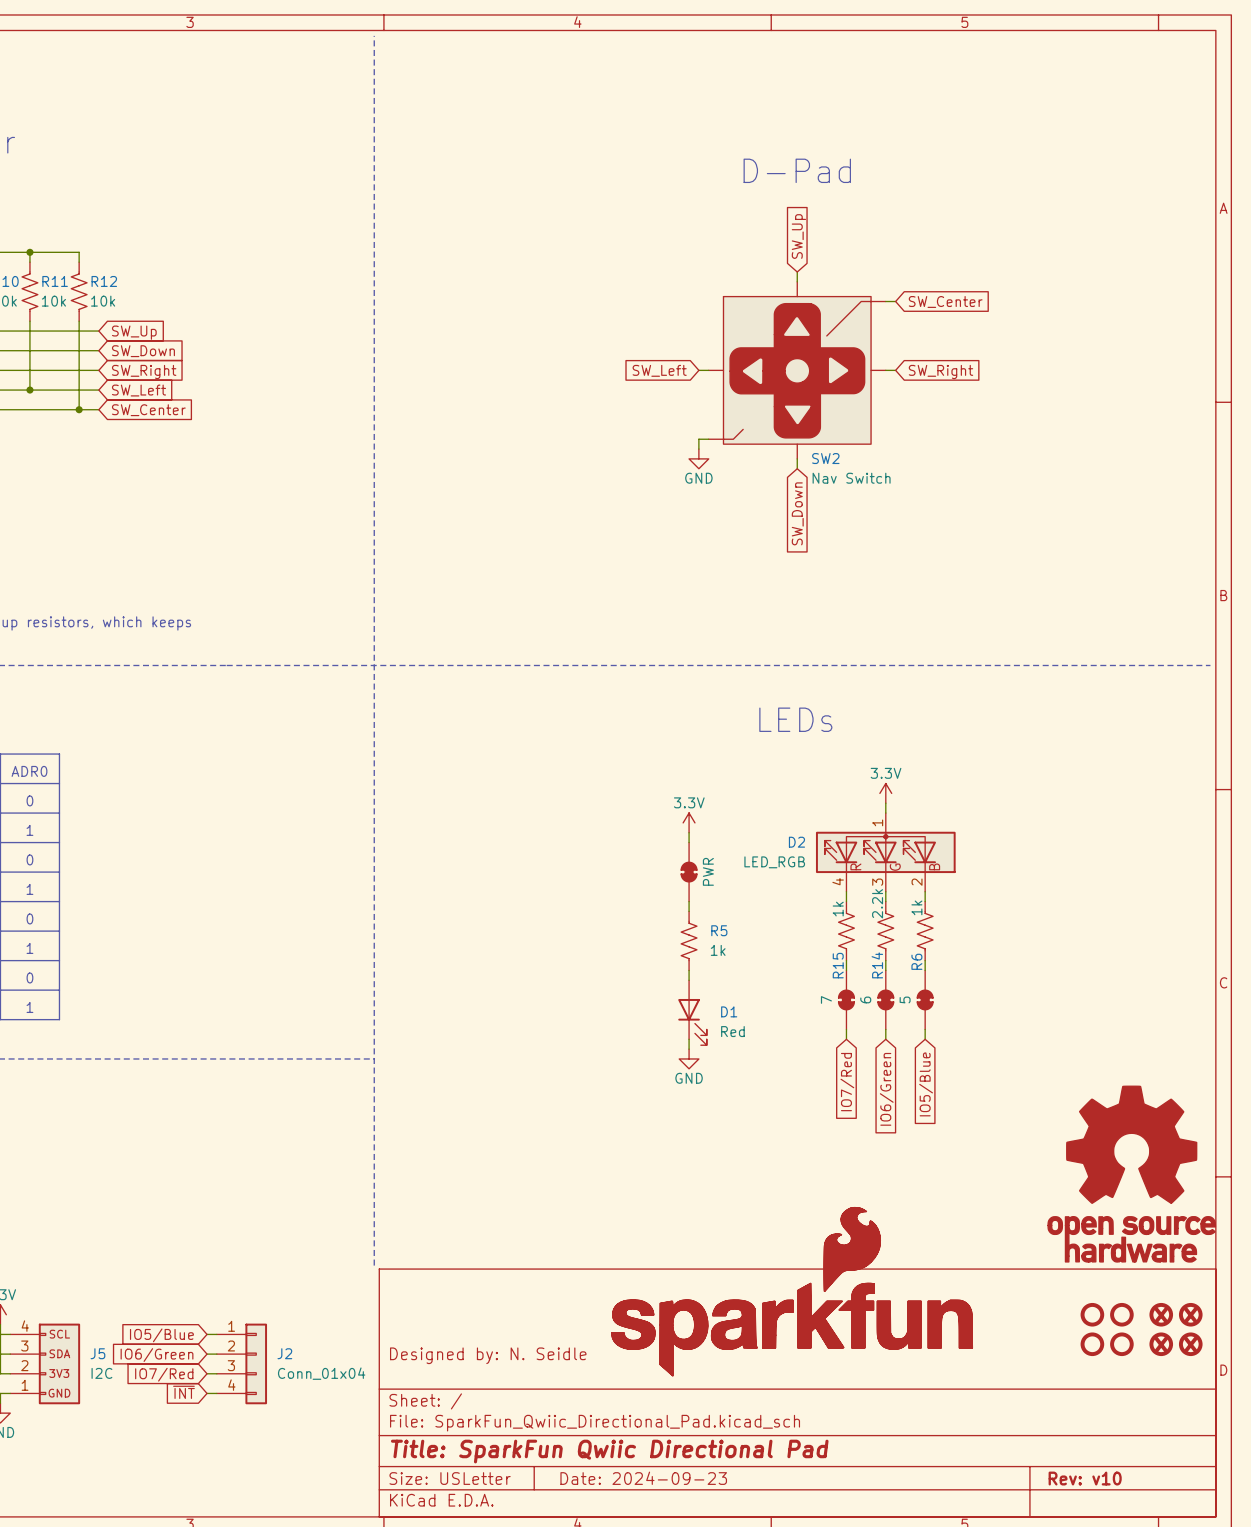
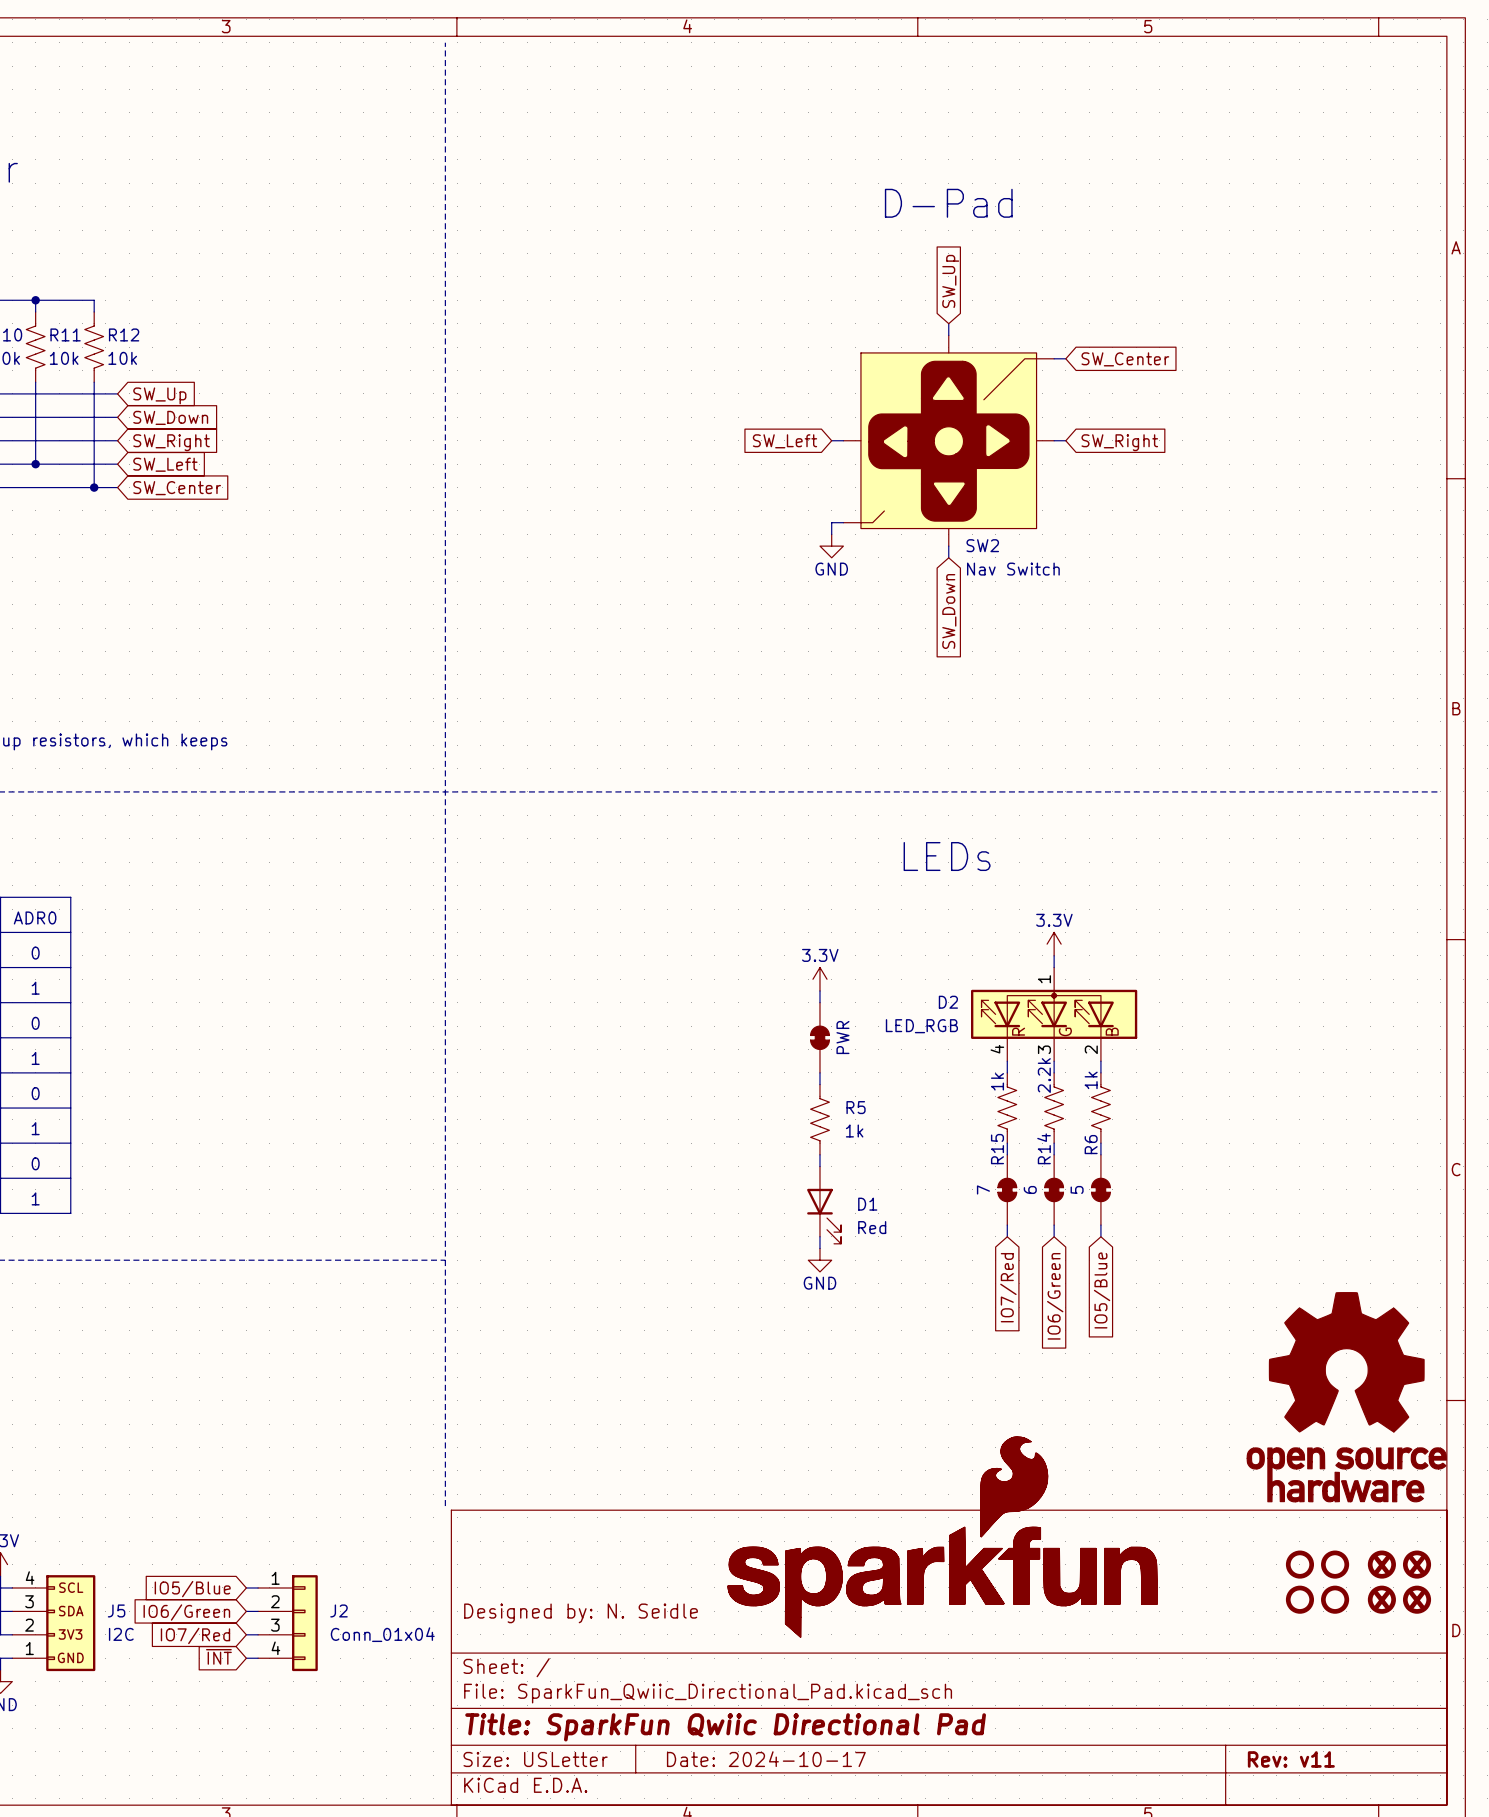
title block: Date: 2024-09-23 (643, 1478) -> Date: 2024-10-17 (766, 1759)
title block: Rev: v10 (1085, 1478) -> Rev: v11 (1291, 1759)

